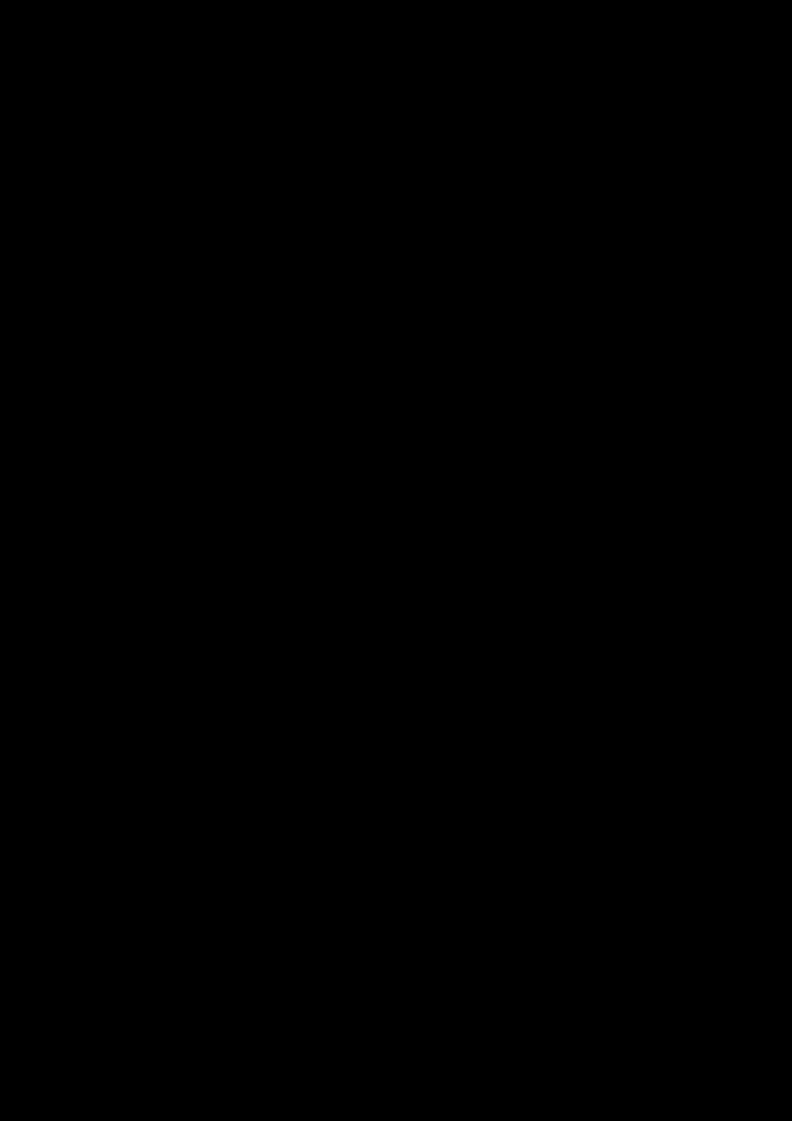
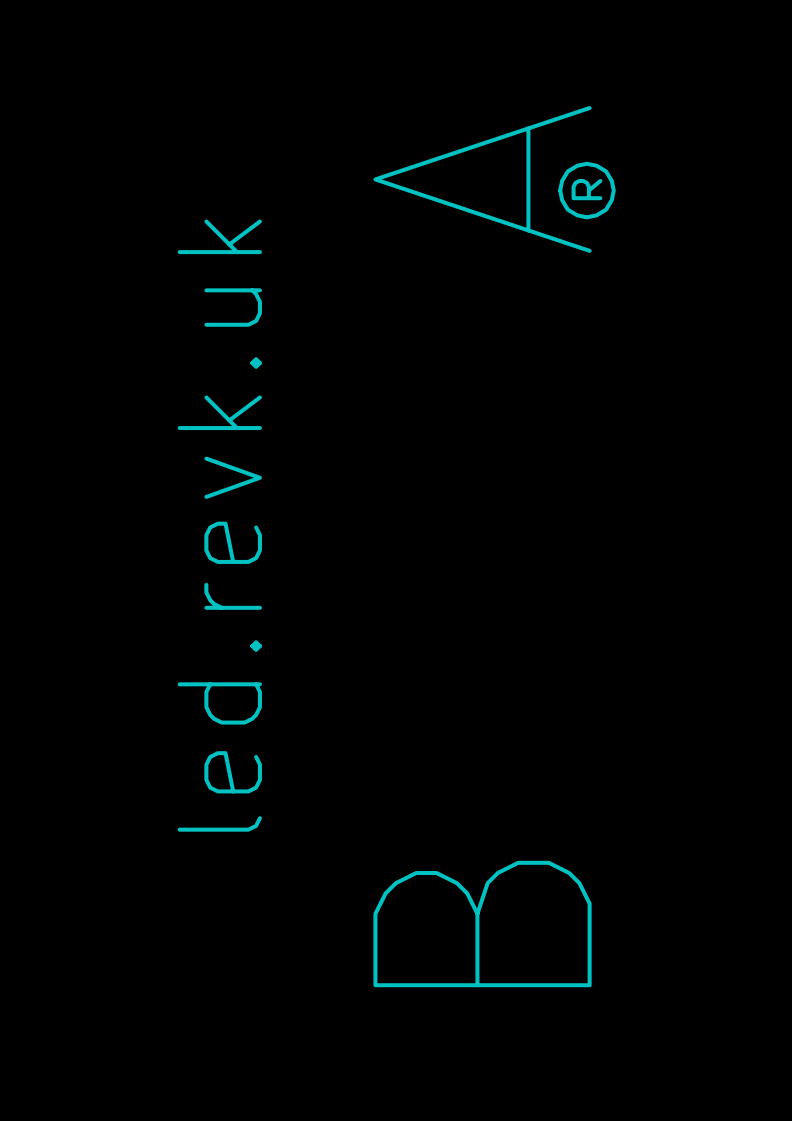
text: none -> A (482, 179)
text: none -> ® (586, 190)
text: none -> led.revk.uk (219, 525)
text: none -> B (482, 924)

